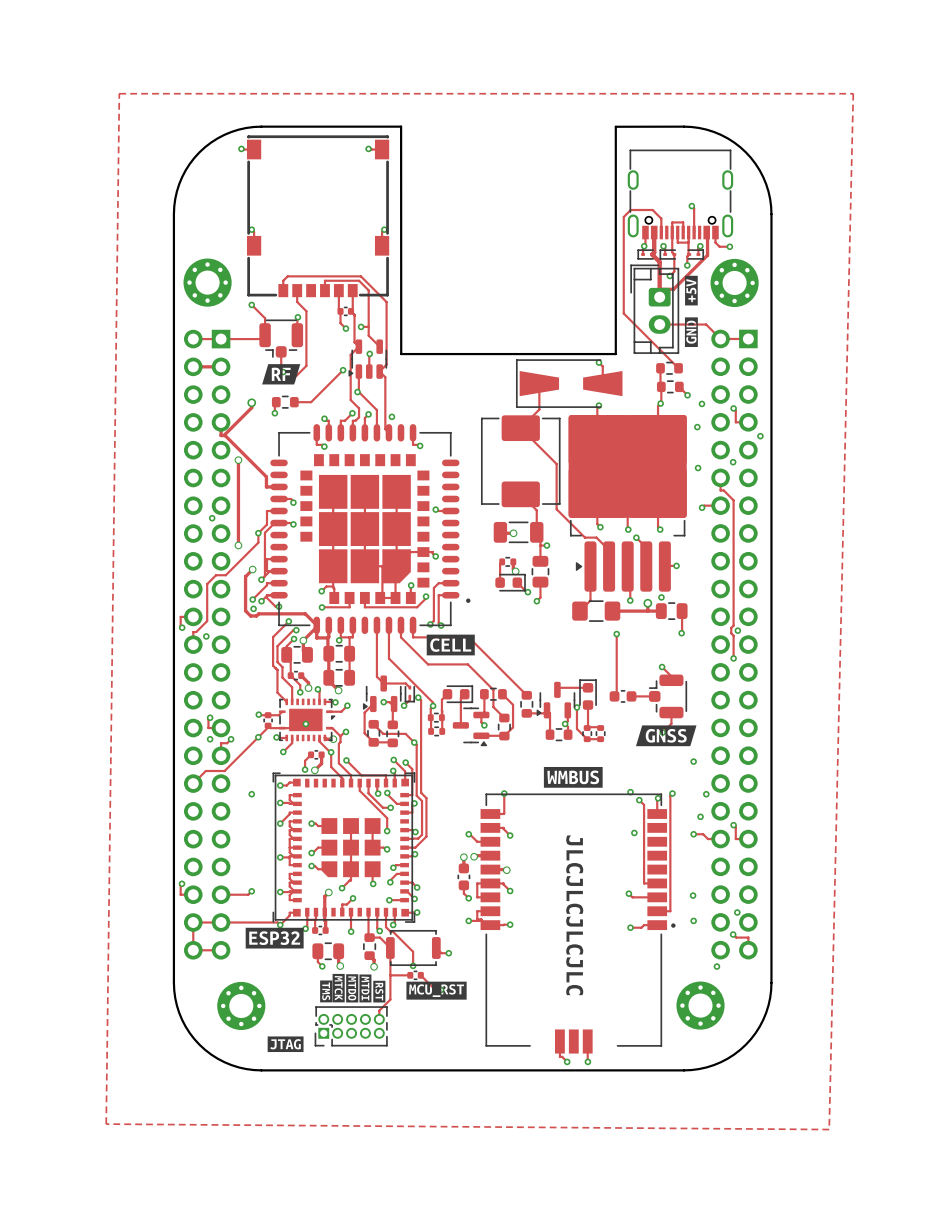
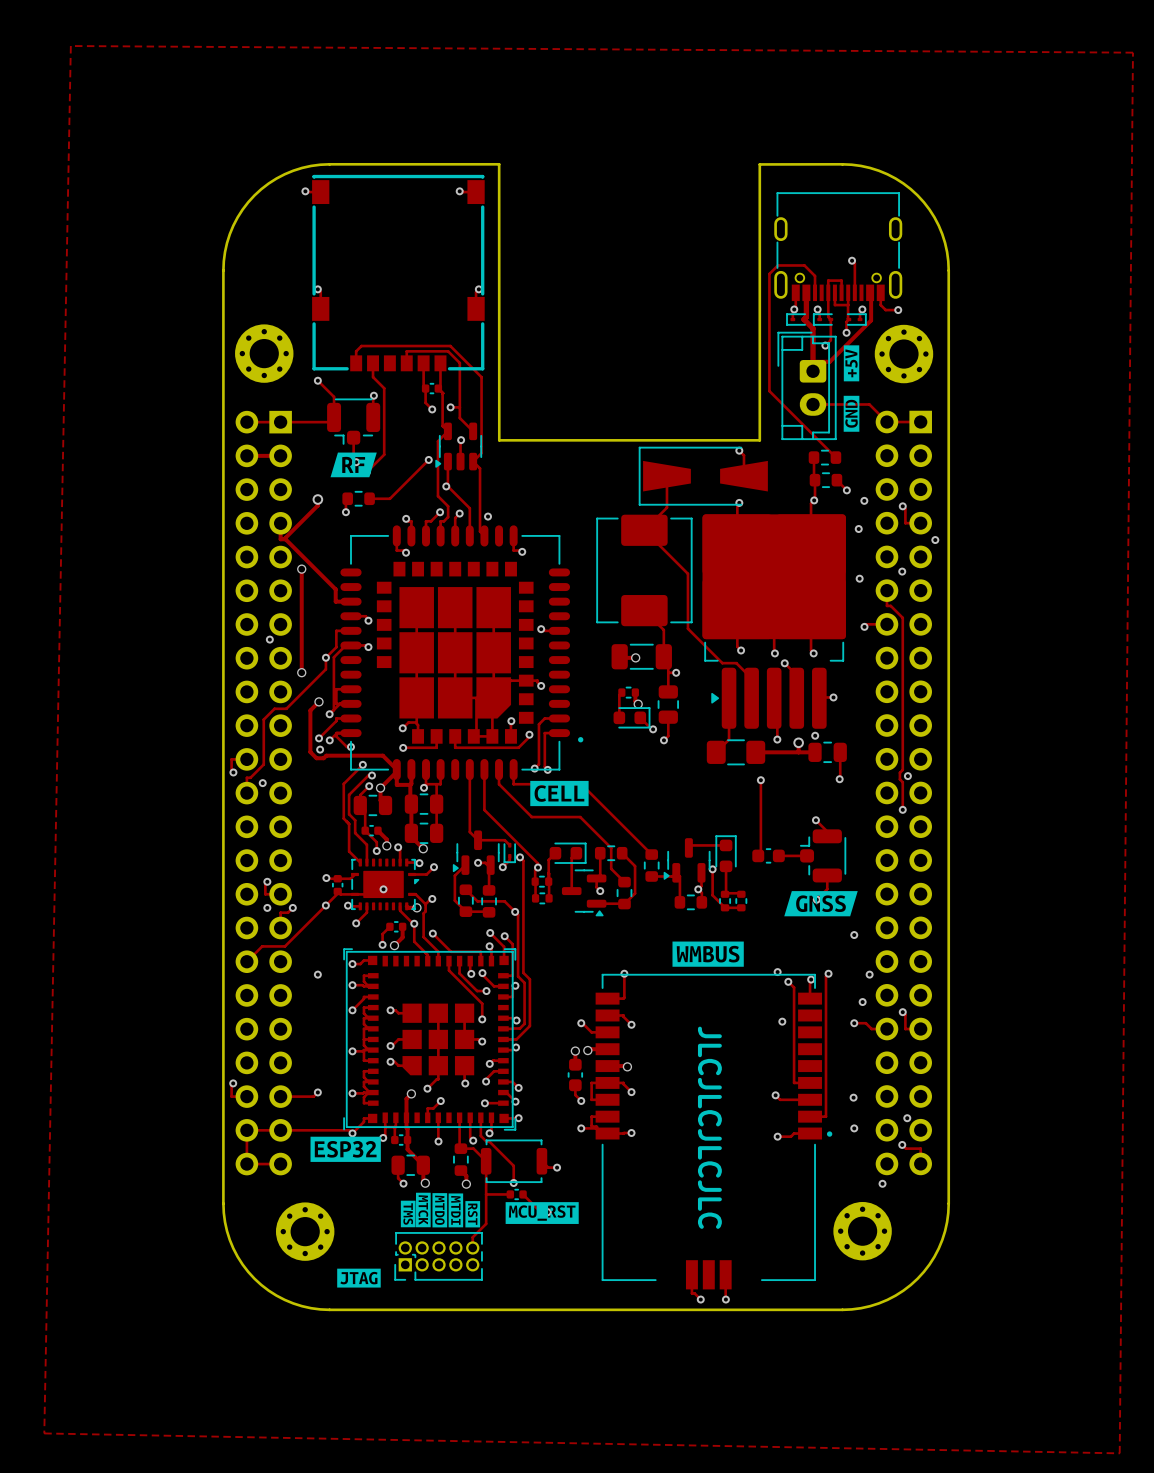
zone outline: (119, 93) (853, 93) (829, 1129) (106, 1124) (119, 93) -> (70, 46) (44, 1433) (1119, 1453) (1133, 52) (70, 46)
track: none -> (407, 1140) (407, 1149) (423, 1165)

